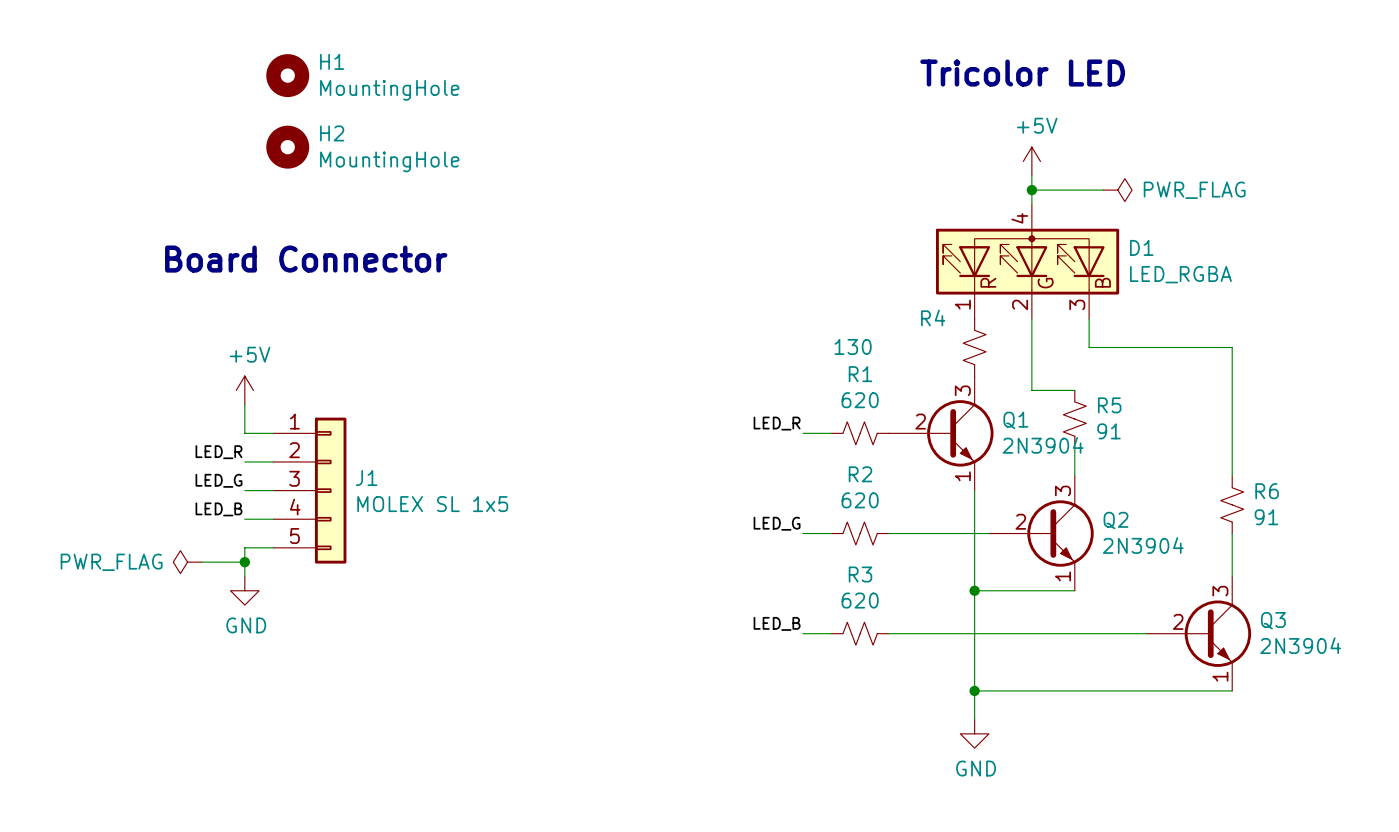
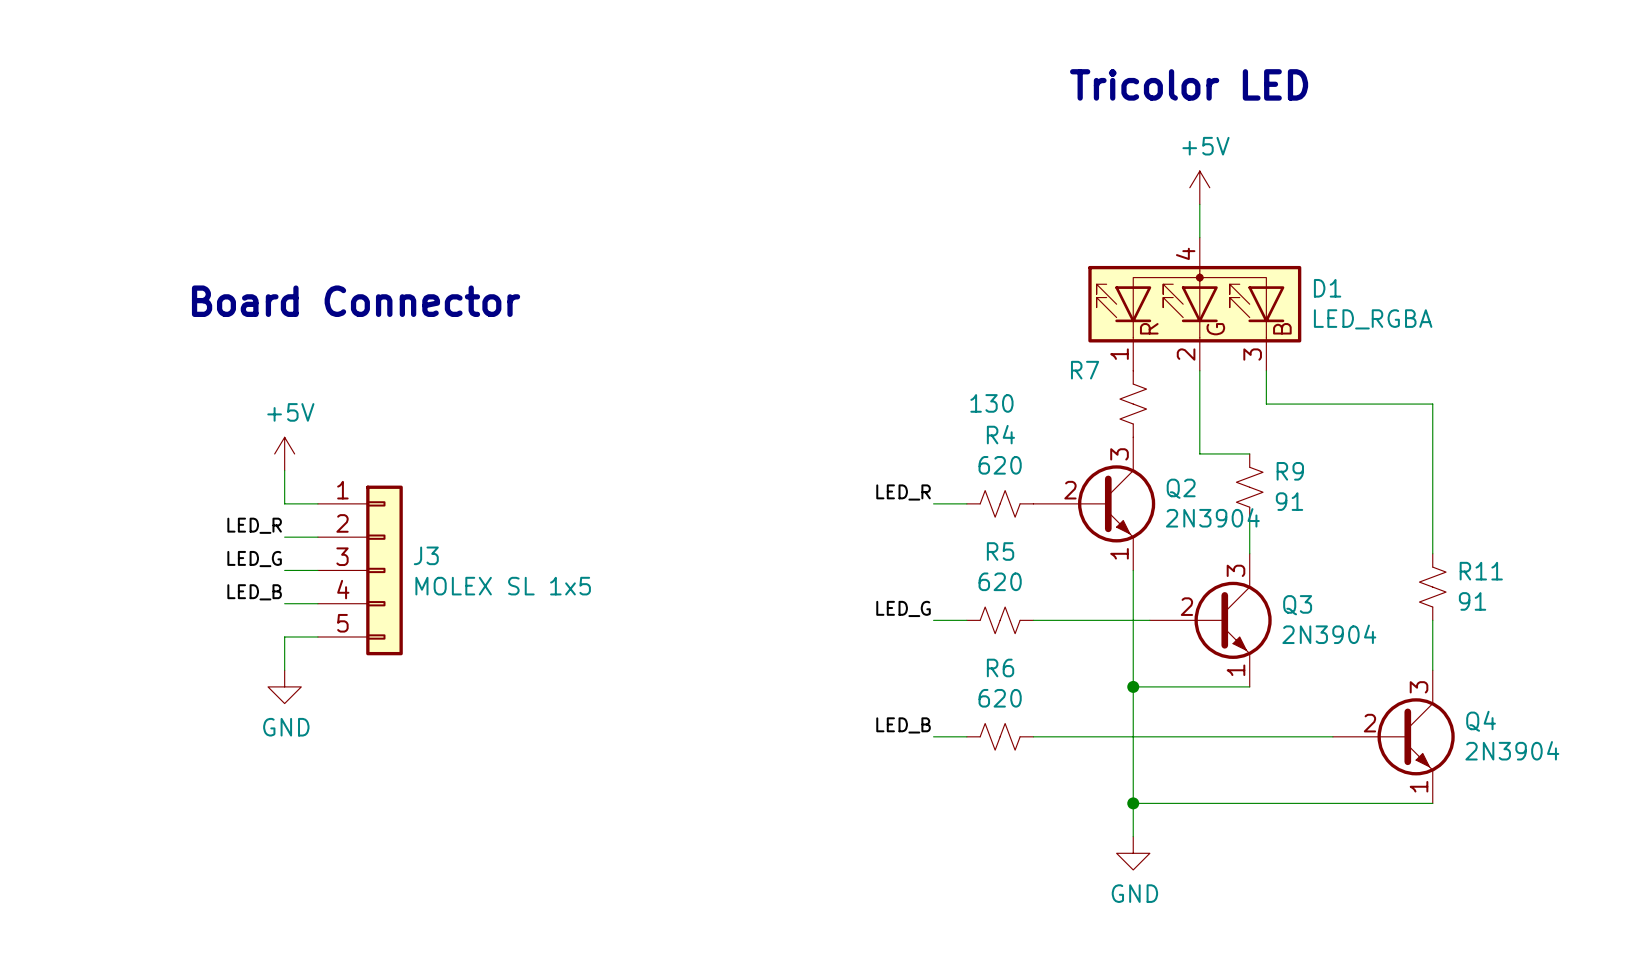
H1: MountingHole (287, 75) -> none
H2: MountingHole (287, 147) -> none
wire: (1031, 190) (1103, 190) -> none
junction: (1031, 190) -> none
power symbol: PWR_FLAG (1117, 190) -> none
R4 name: R4 (933, 318) -> R7 (1085, 370)
R1 name: R1 (860, 374) -> R4 (1000, 434)
R5 name: R5 (1109, 405) -> R9 (1290, 471)
Q1 name: Q1 (1015, 420) -> Q2 (1181, 488)
R2 name: R2 (860, 474) -> R5 (1000, 551)
J1 name: J1 (366, 478) -> J3 (426, 555)
R6 name: R6 (1267, 491) -> R11 (1481, 571)
Q2 name: Q2 (1116, 520) -> Q3 (1297, 605)
power symbol: PWR_FLAG (187, 562) -> none
wire: (201, 562) (244, 562) -> none
junction: (244, 562) -> none
R3 name: R3 (860, 574) -> R6 (1000, 667)
Q3 name: Q3 (1273, 620) -> Q4 (1481, 721)

